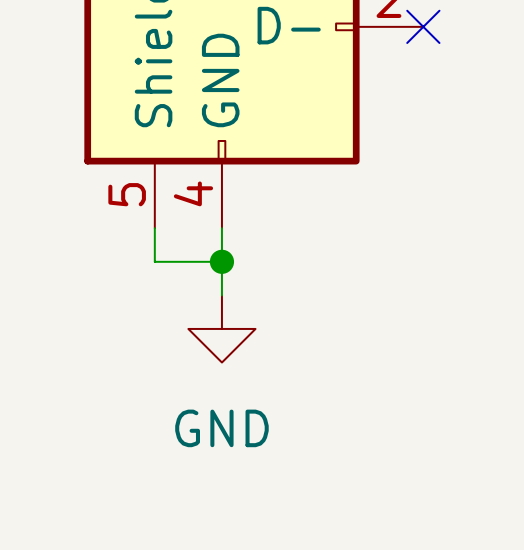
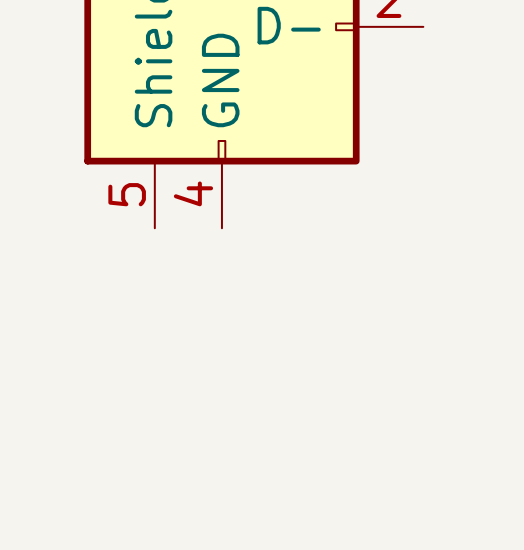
no-connect mark: (423, 26) -> none
wire: (154, 228) (154, 261) (221, 261) -> none
wire: (221, 228) (221, 295) -> none
junction: (221, 261) -> none
power symbol: GND (221, 328) -> none

